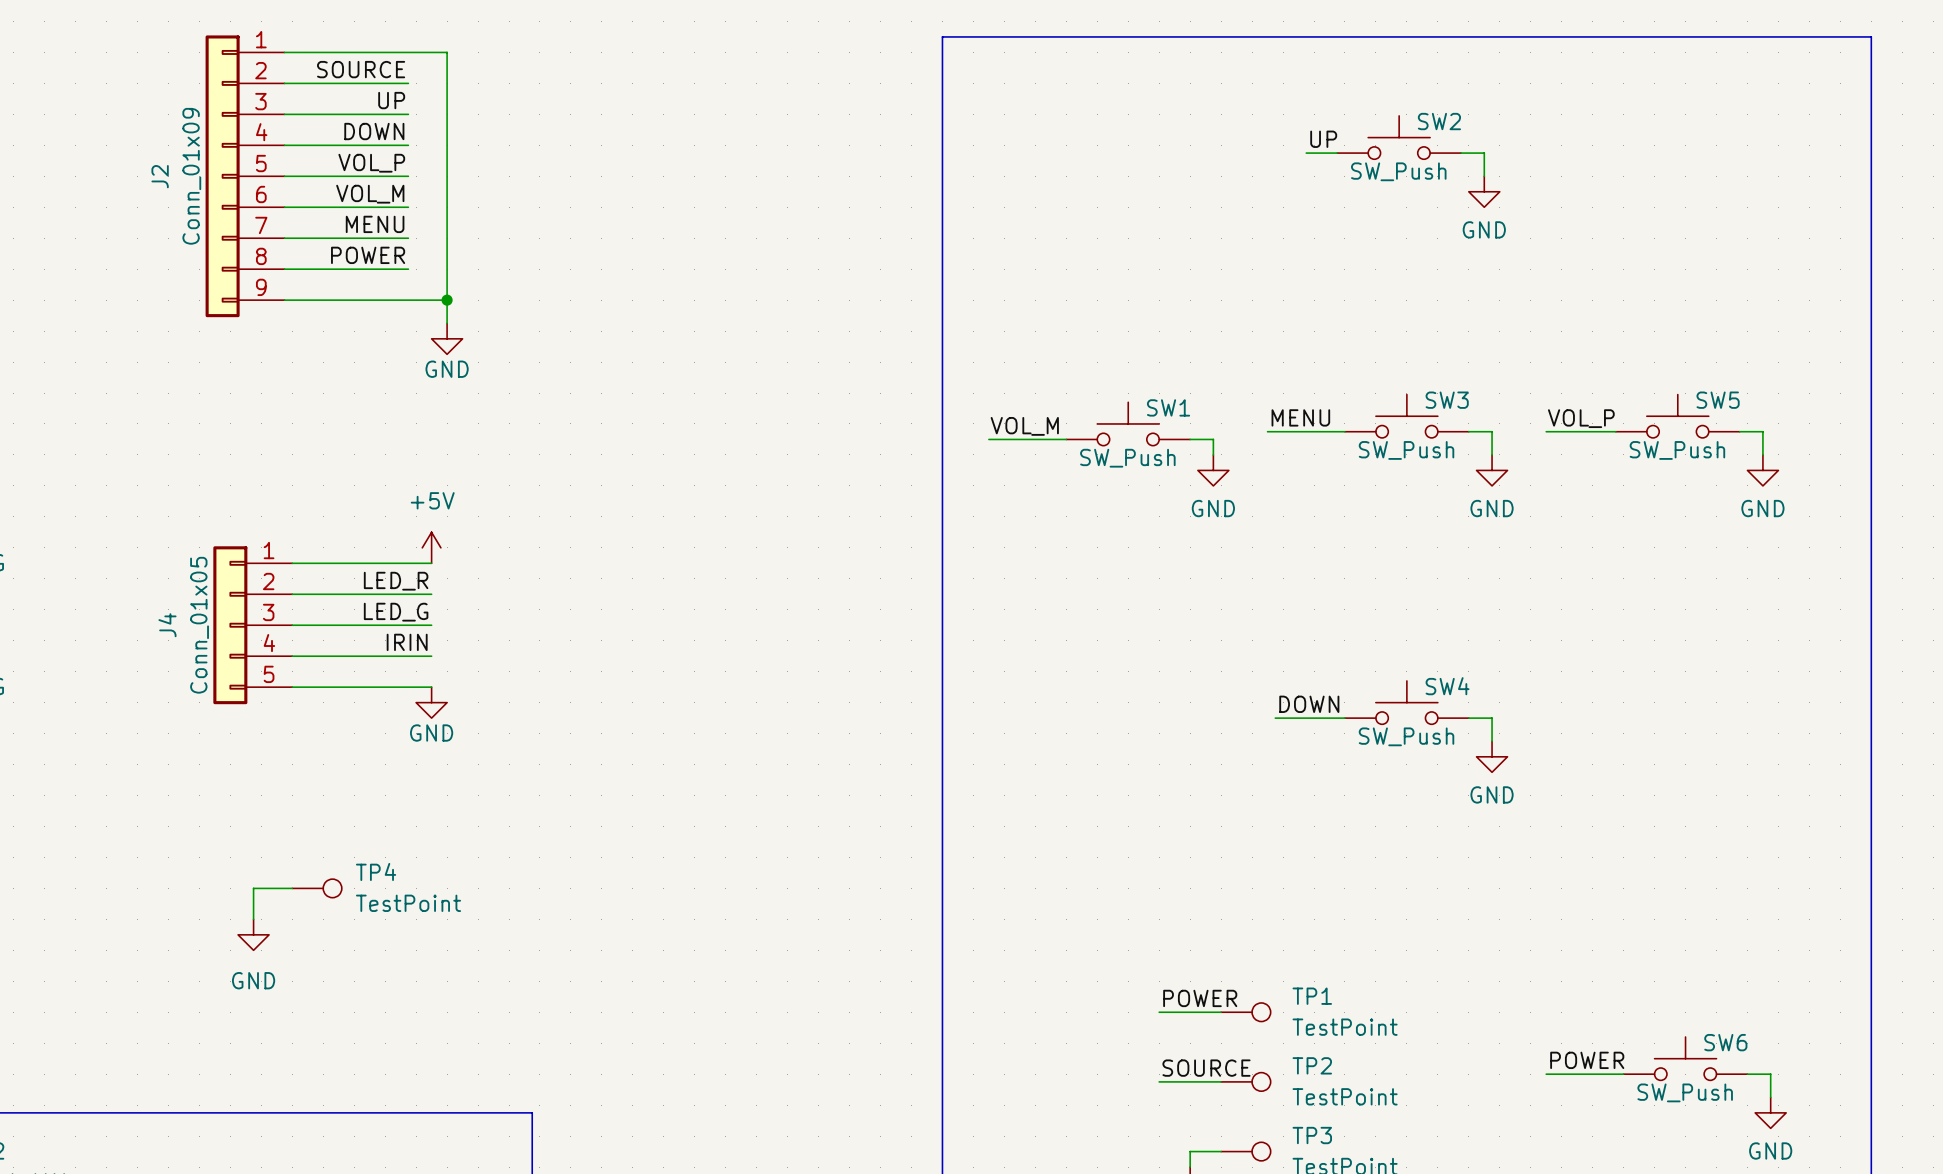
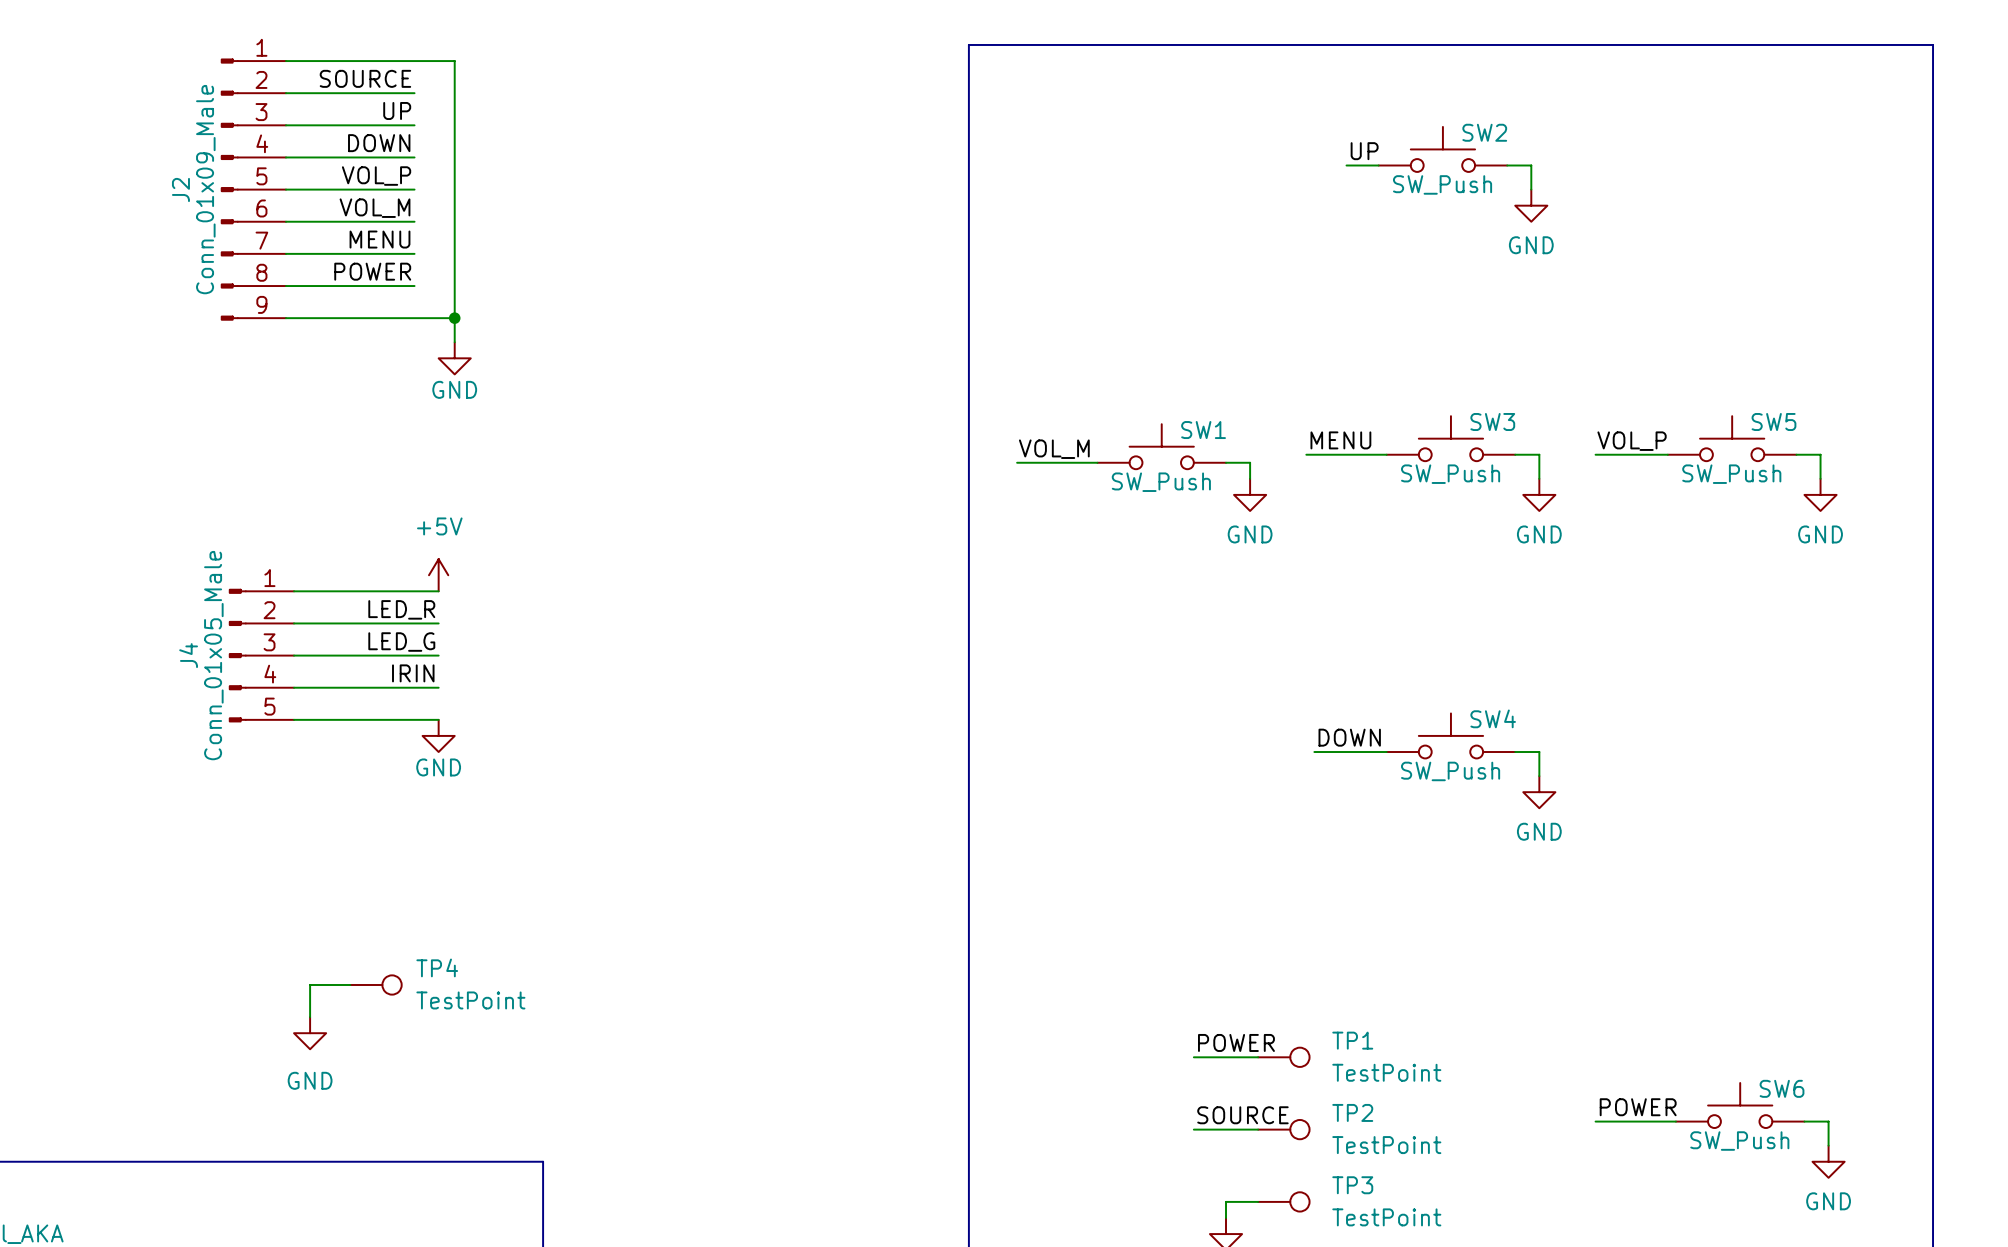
J2 symbol: [205, 35, 285, 318] -> [220, 58, 286, 321]
J2 value: Conn_01x09 (191, 176) -> Conn_01x09_Male (205, 189)
J4 symbol: [213, 546, 293, 705] -> [228, 588, 295, 723]
J4 value: Conn_01x05 (199, 625) -> Conn_01x05_Male (213, 655)
wire: (292, 888) (253, 888) (253, 919) -> (350, 984) (310, 984) (310, 1017)
TP4 position: (317, 888) -> (375, 984)
power symbol position: GND (253, 934) -> GND (310, 1033)

